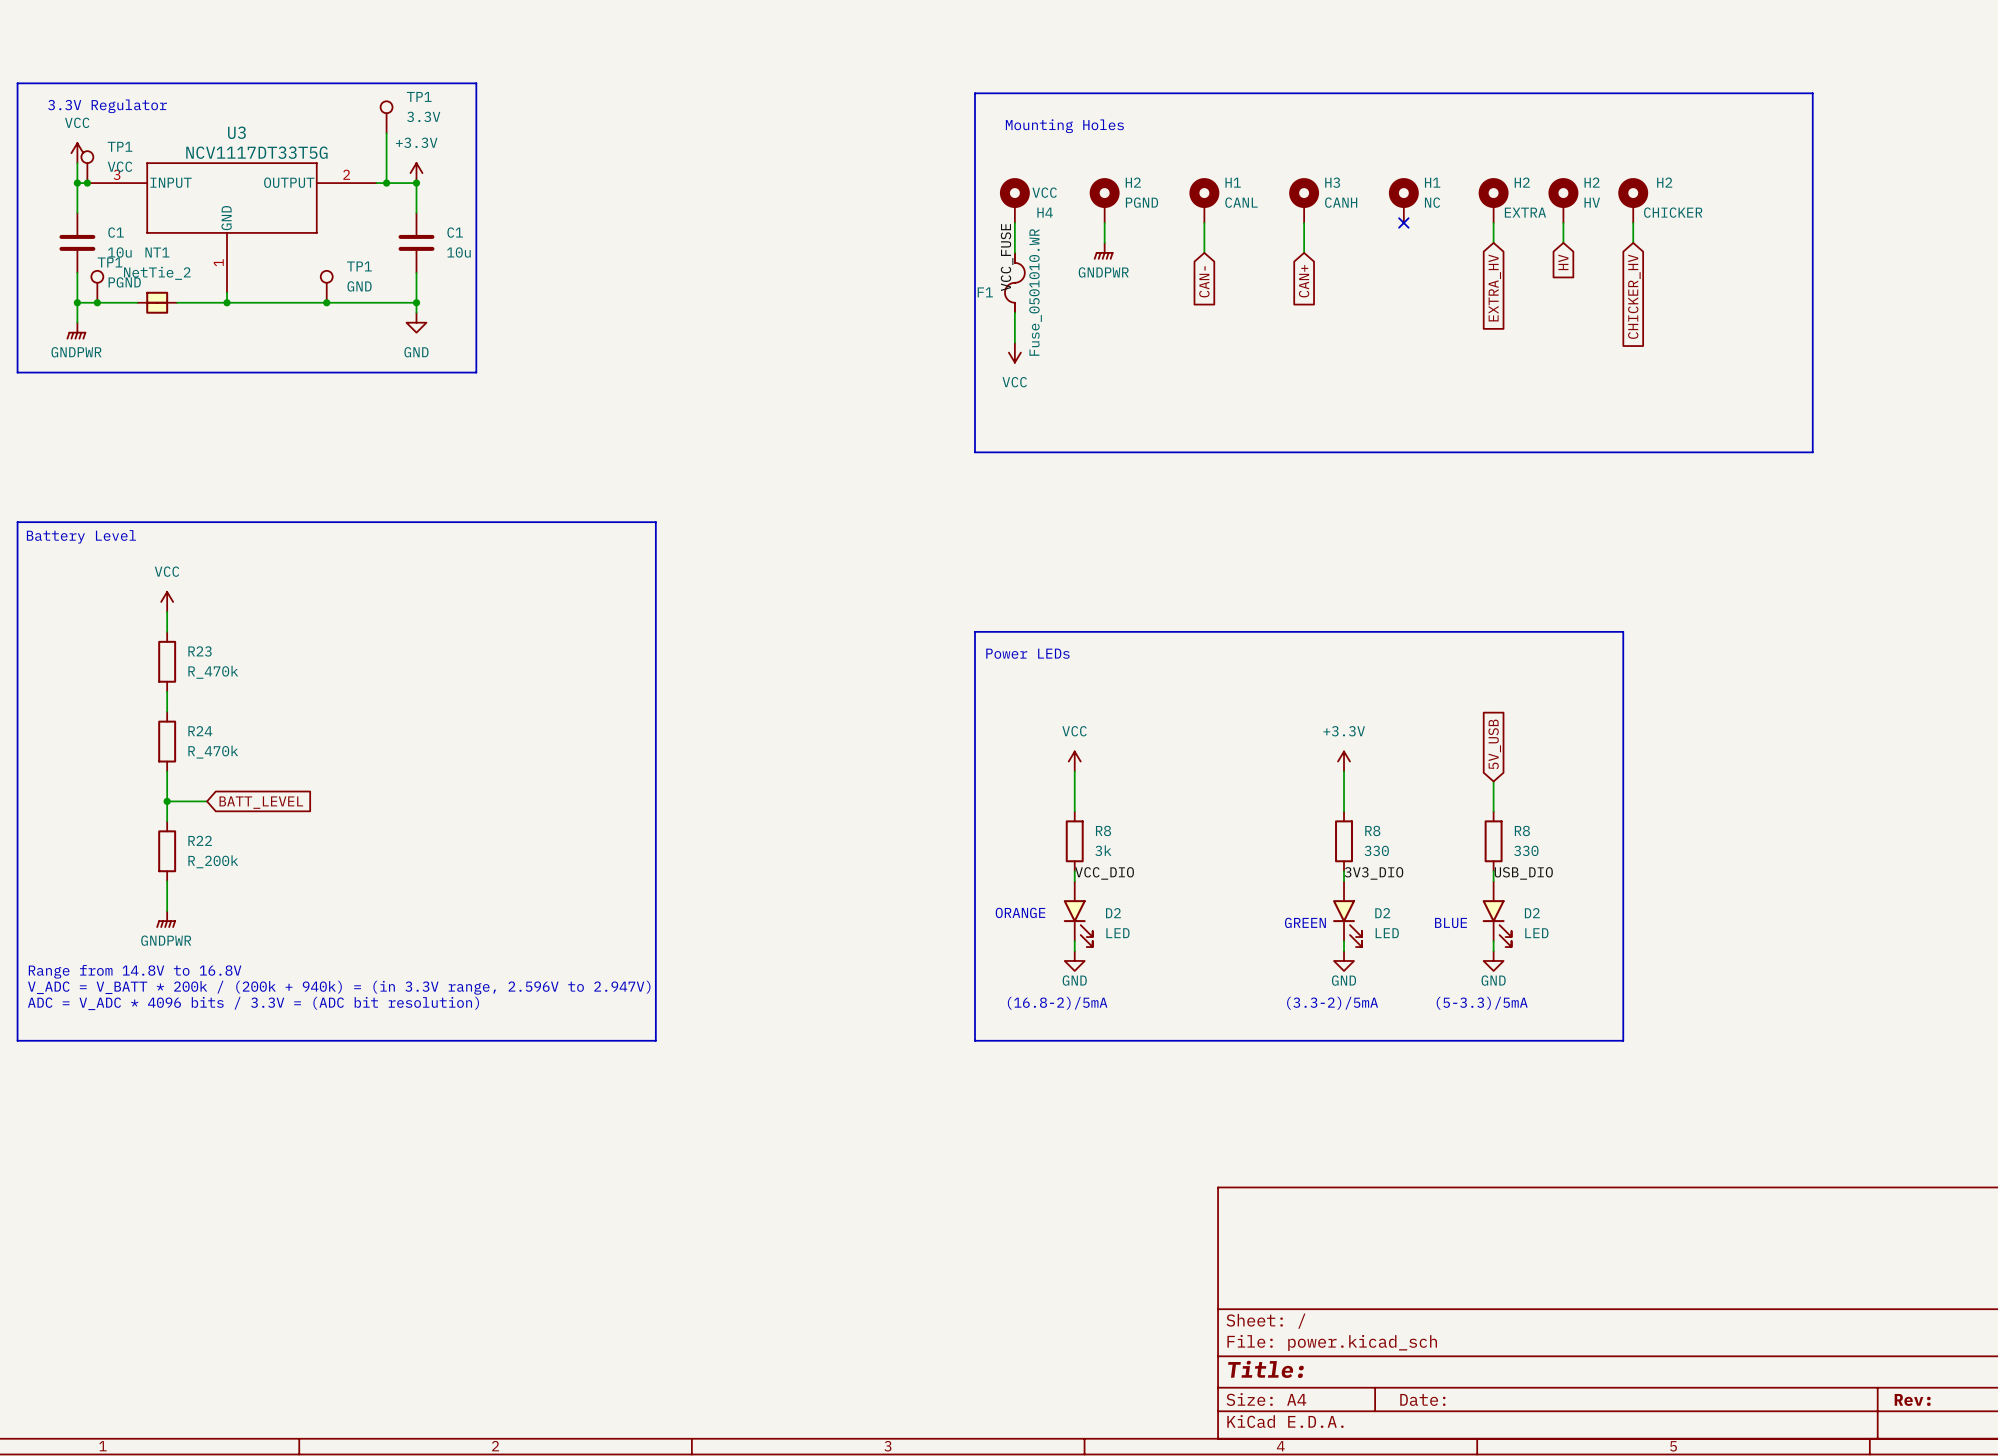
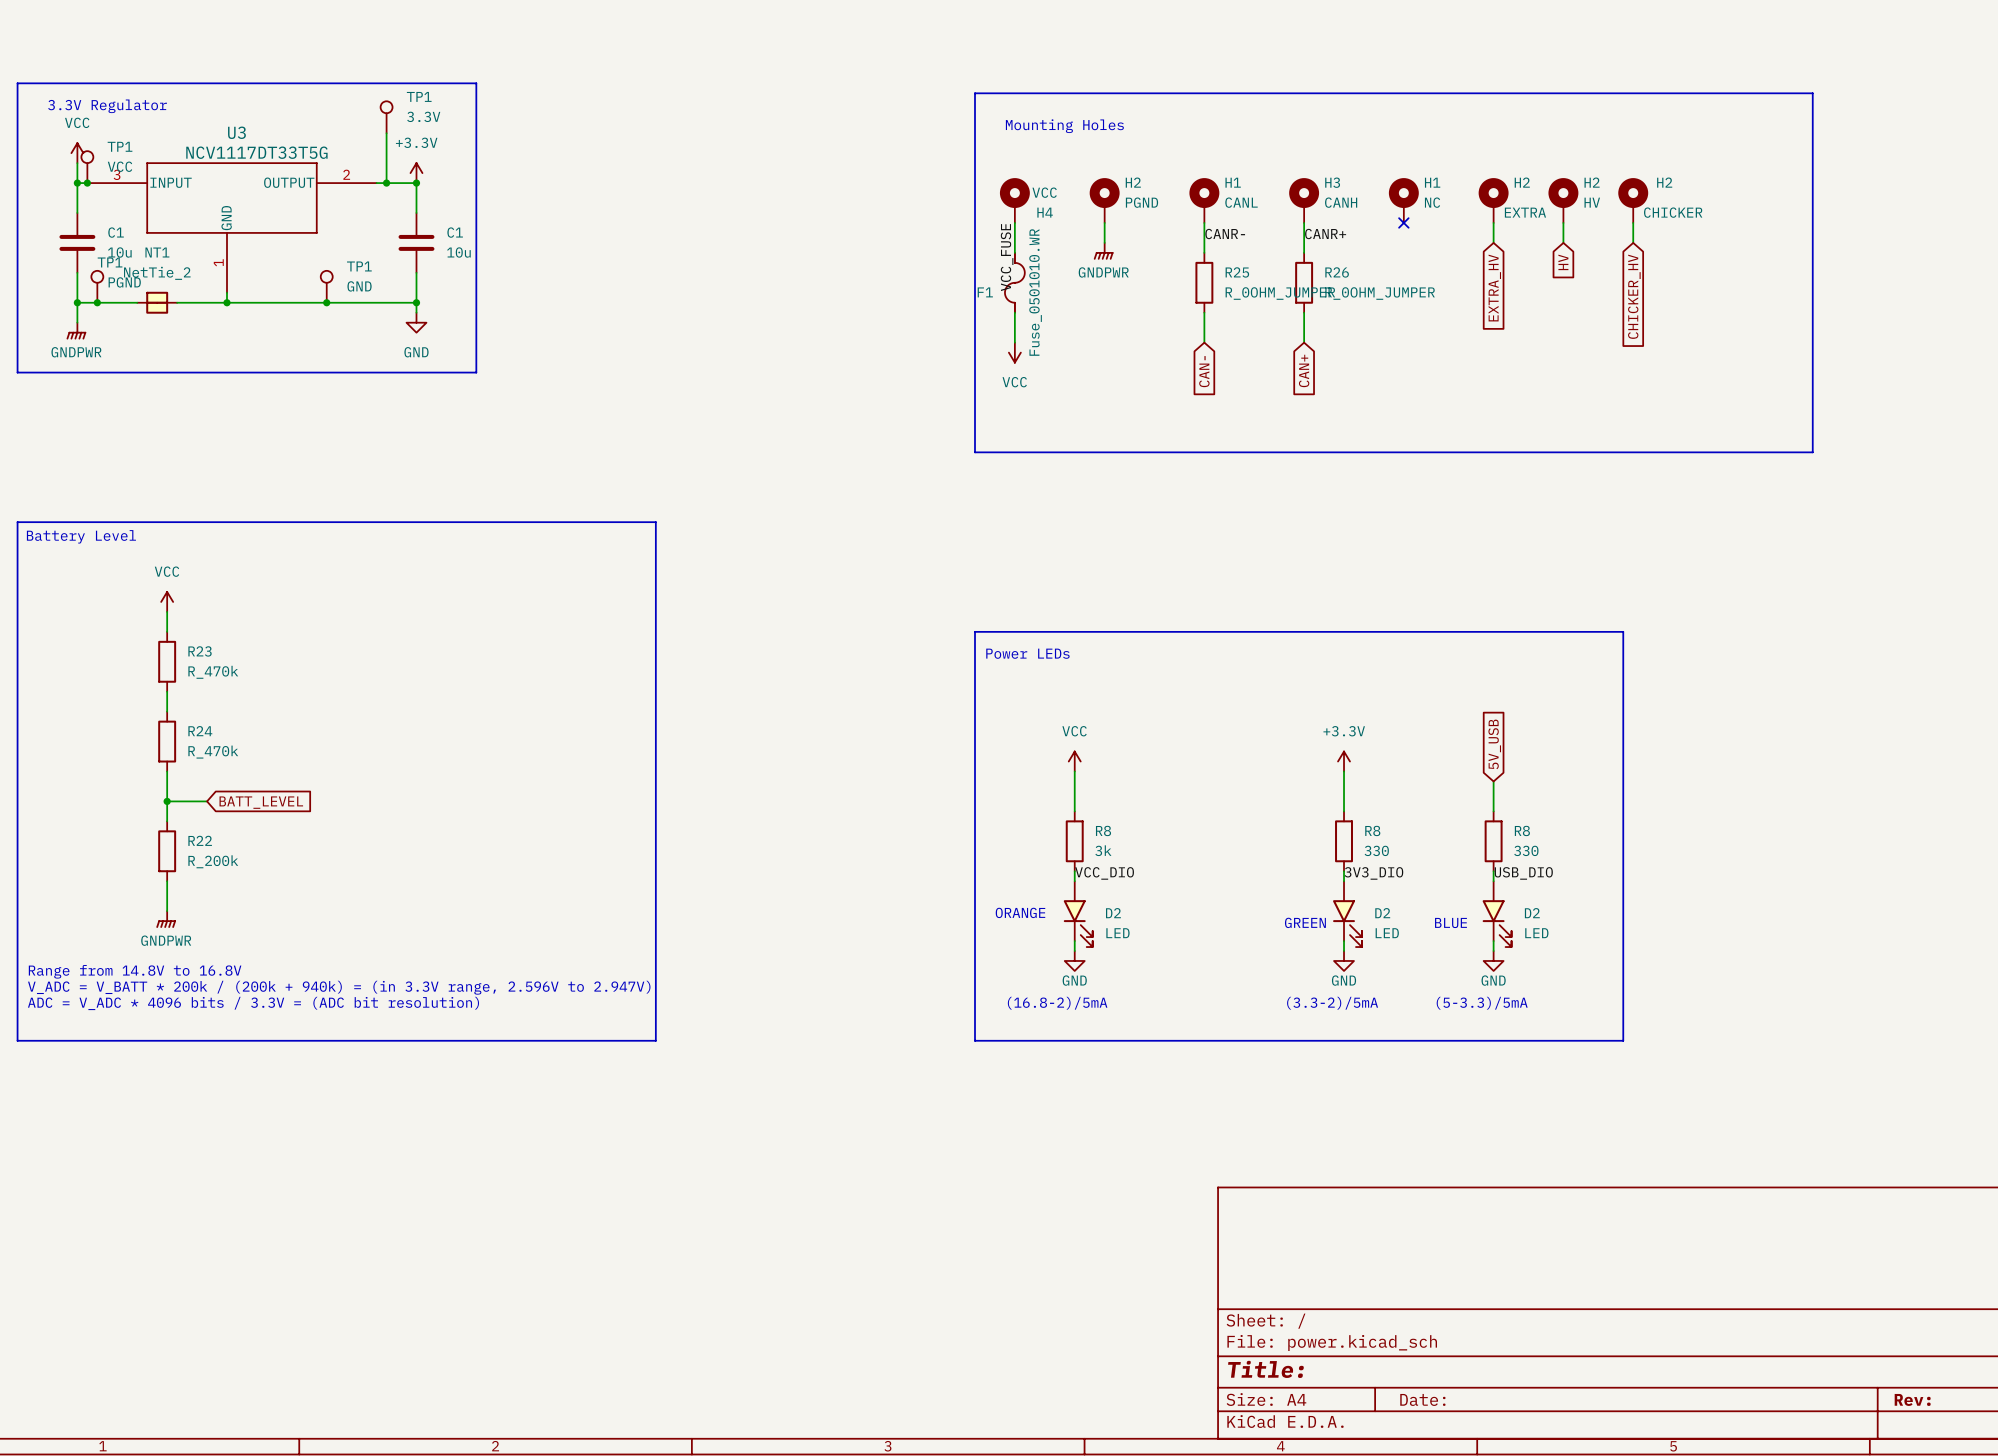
label: none -> CANR- (1225, 234)
label: none -> CANR+ (1325, 234)
global label position: CAN- (1204, 281) -> CAN- (1204, 371)
global label position: CAN+ (1304, 281) -> CAN+ (1304, 370)
R25: none -> R_0OHM_JUMPER (1204, 282)
R26: none -> R_0OHM_JUMPER (1304, 282)
wire: none -> (1204, 312) (1204, 342)
wire: none -> (1304, 312) (1304, 342)

